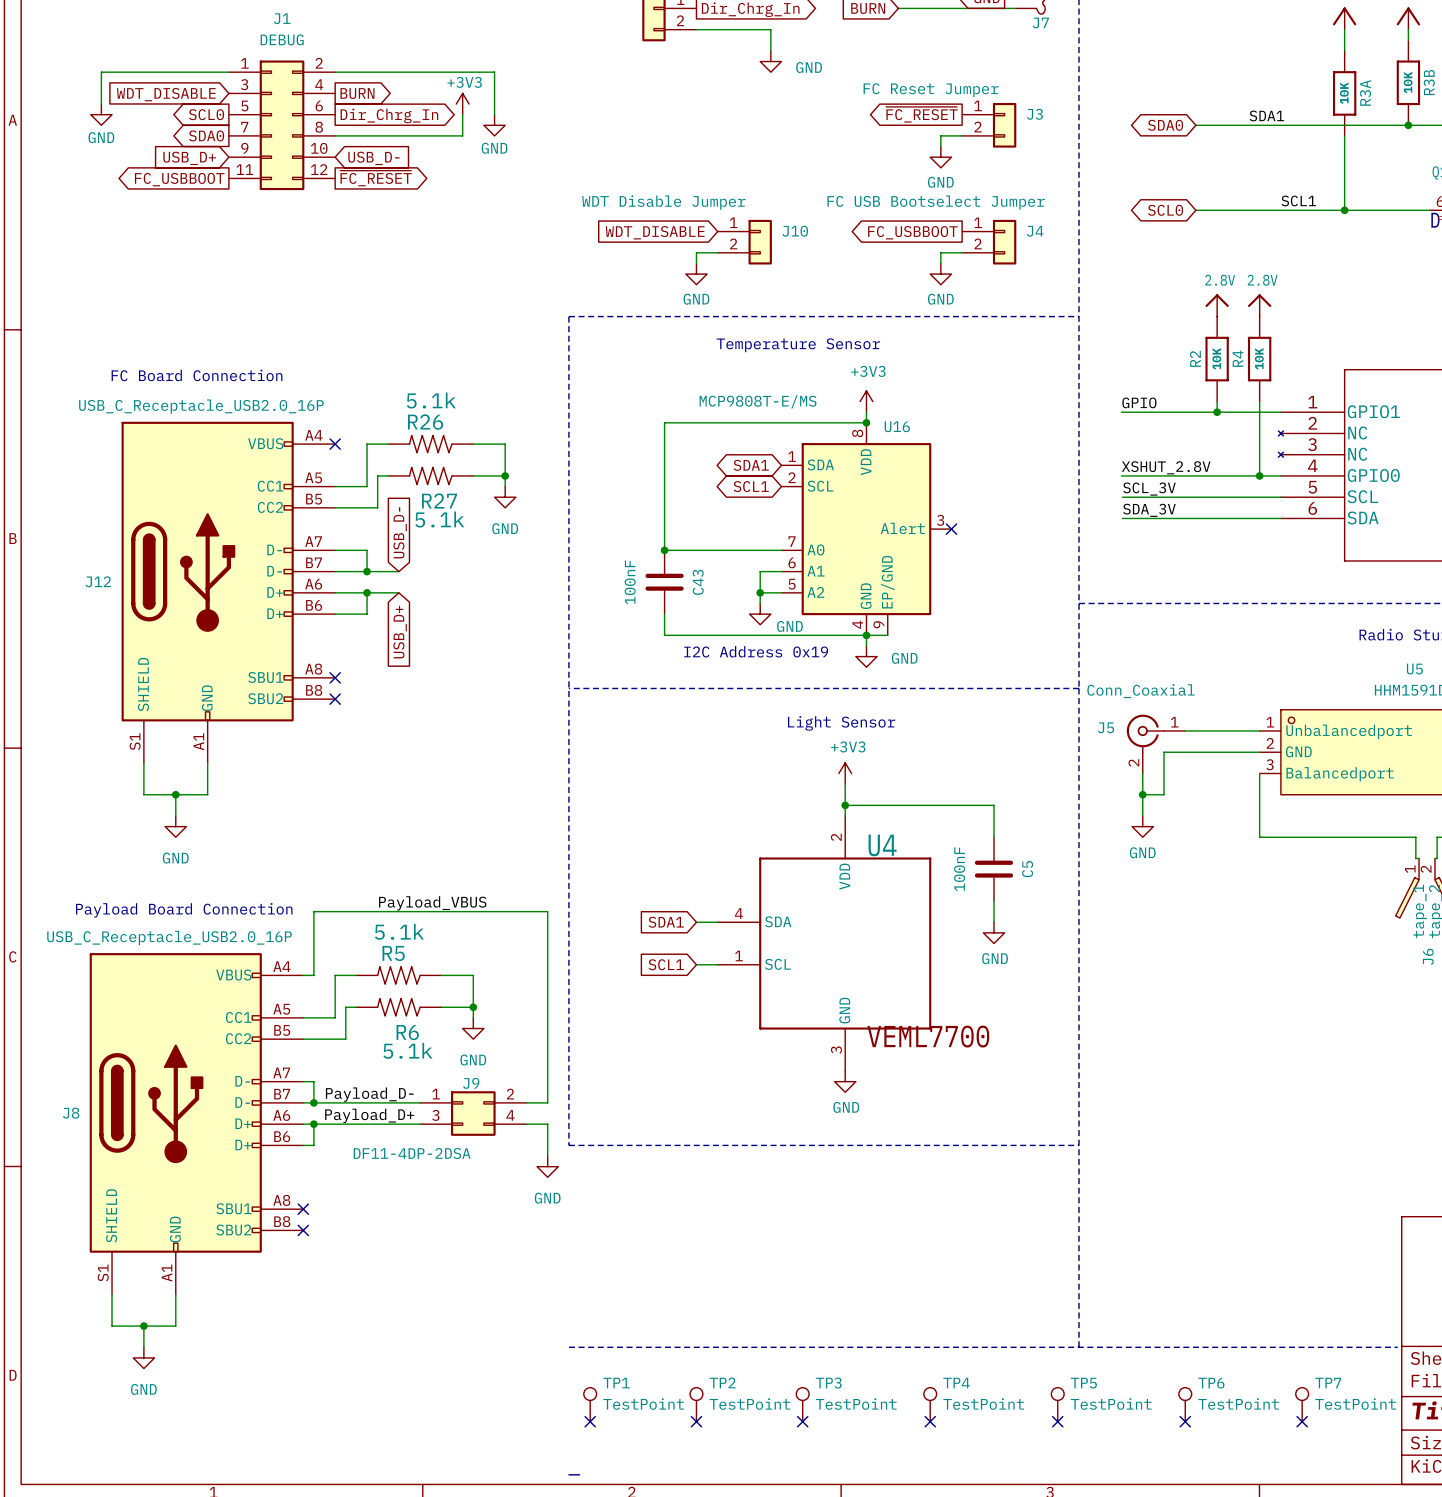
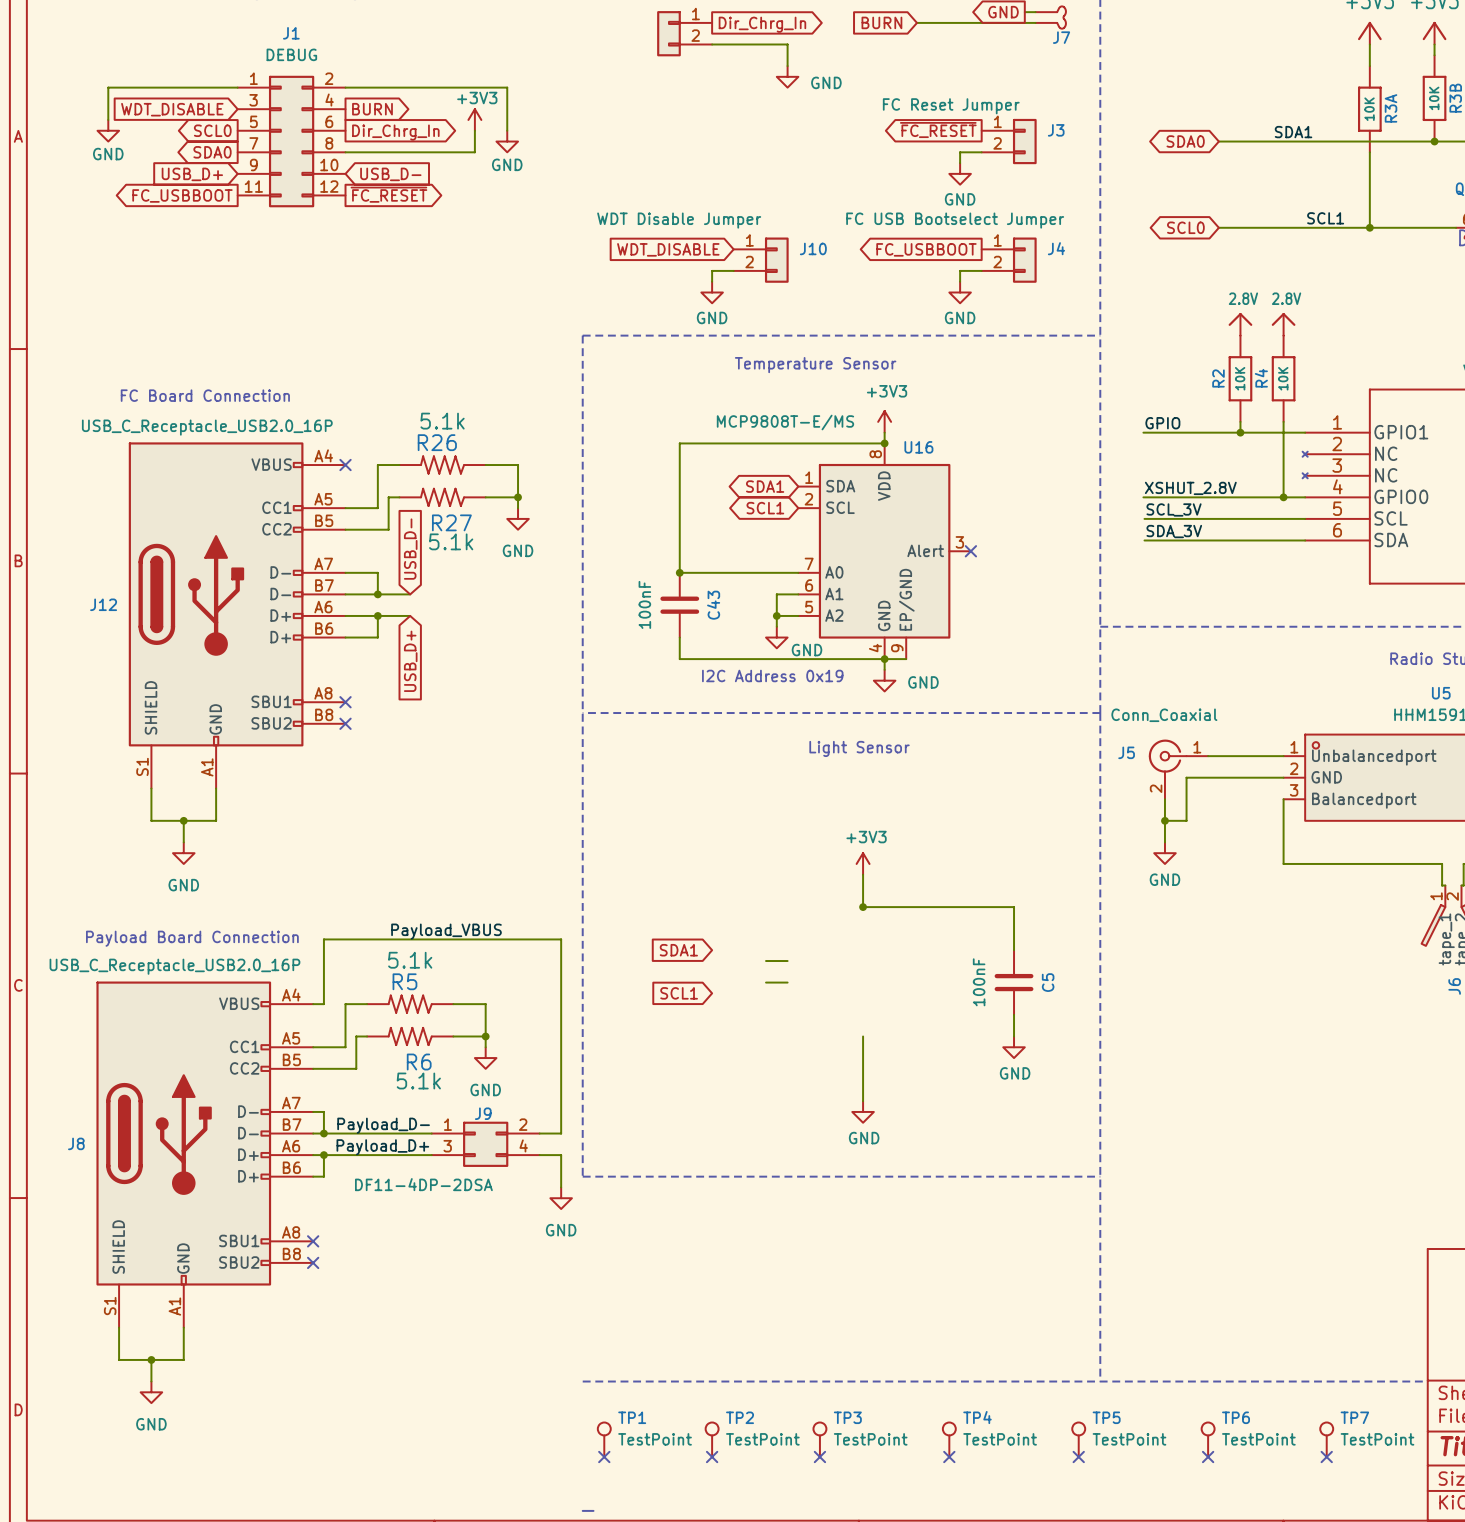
power symbol position: +3V3 (845, 773) -> +3V3 (863, 863)
wire: (845, 784) (845, 816) -> none
wire: (845, 805) (993, 805) (993, 837) -> none
junction: (845, 805) -> none
wire: none -> (863, 874) (863, 907) (1014, 907) (1014, 928)
C5 position: (993, 869) -> (1014, 982)
junction: none -> (863, 907)
wire: (696, 922) (717, 922) -> (766, 961) (787, 961)
power symbol position: GND (993, 932) -> GND (1014, 1047)
U4: (824, 943) -> none
wire: (696, 964) (717, 964) -> (766, 982) (787, 982)
wire: none -> (1014, 1014) (1014, 1036)

